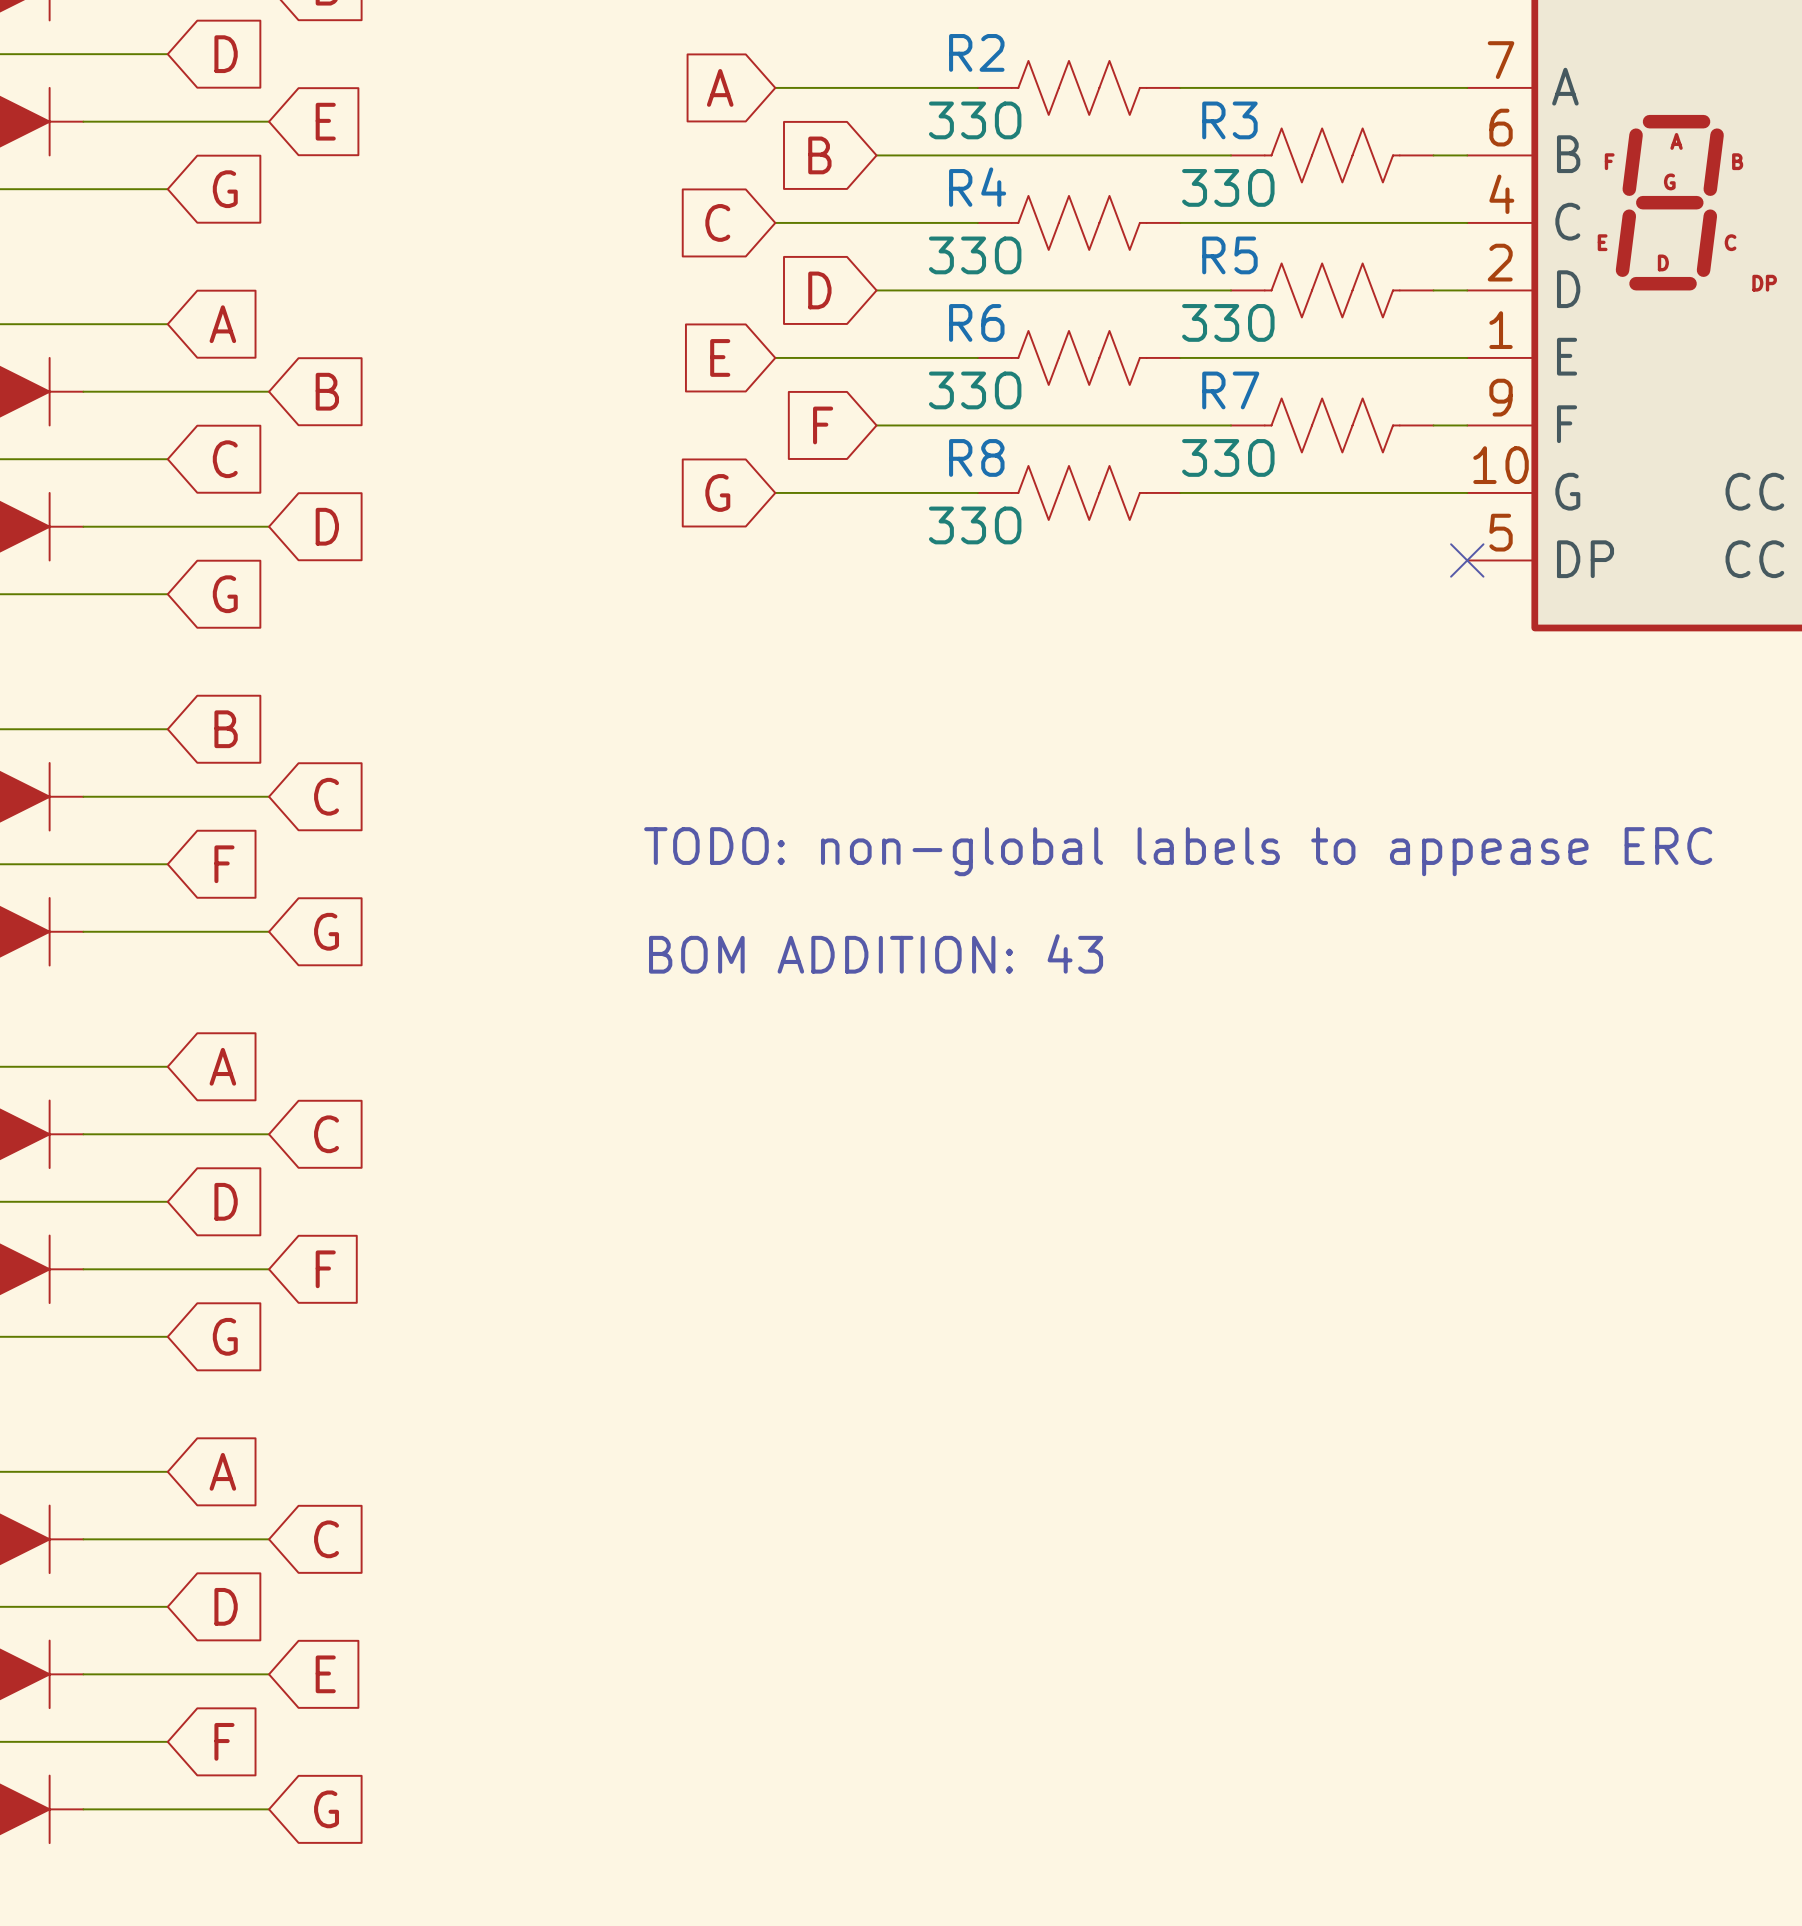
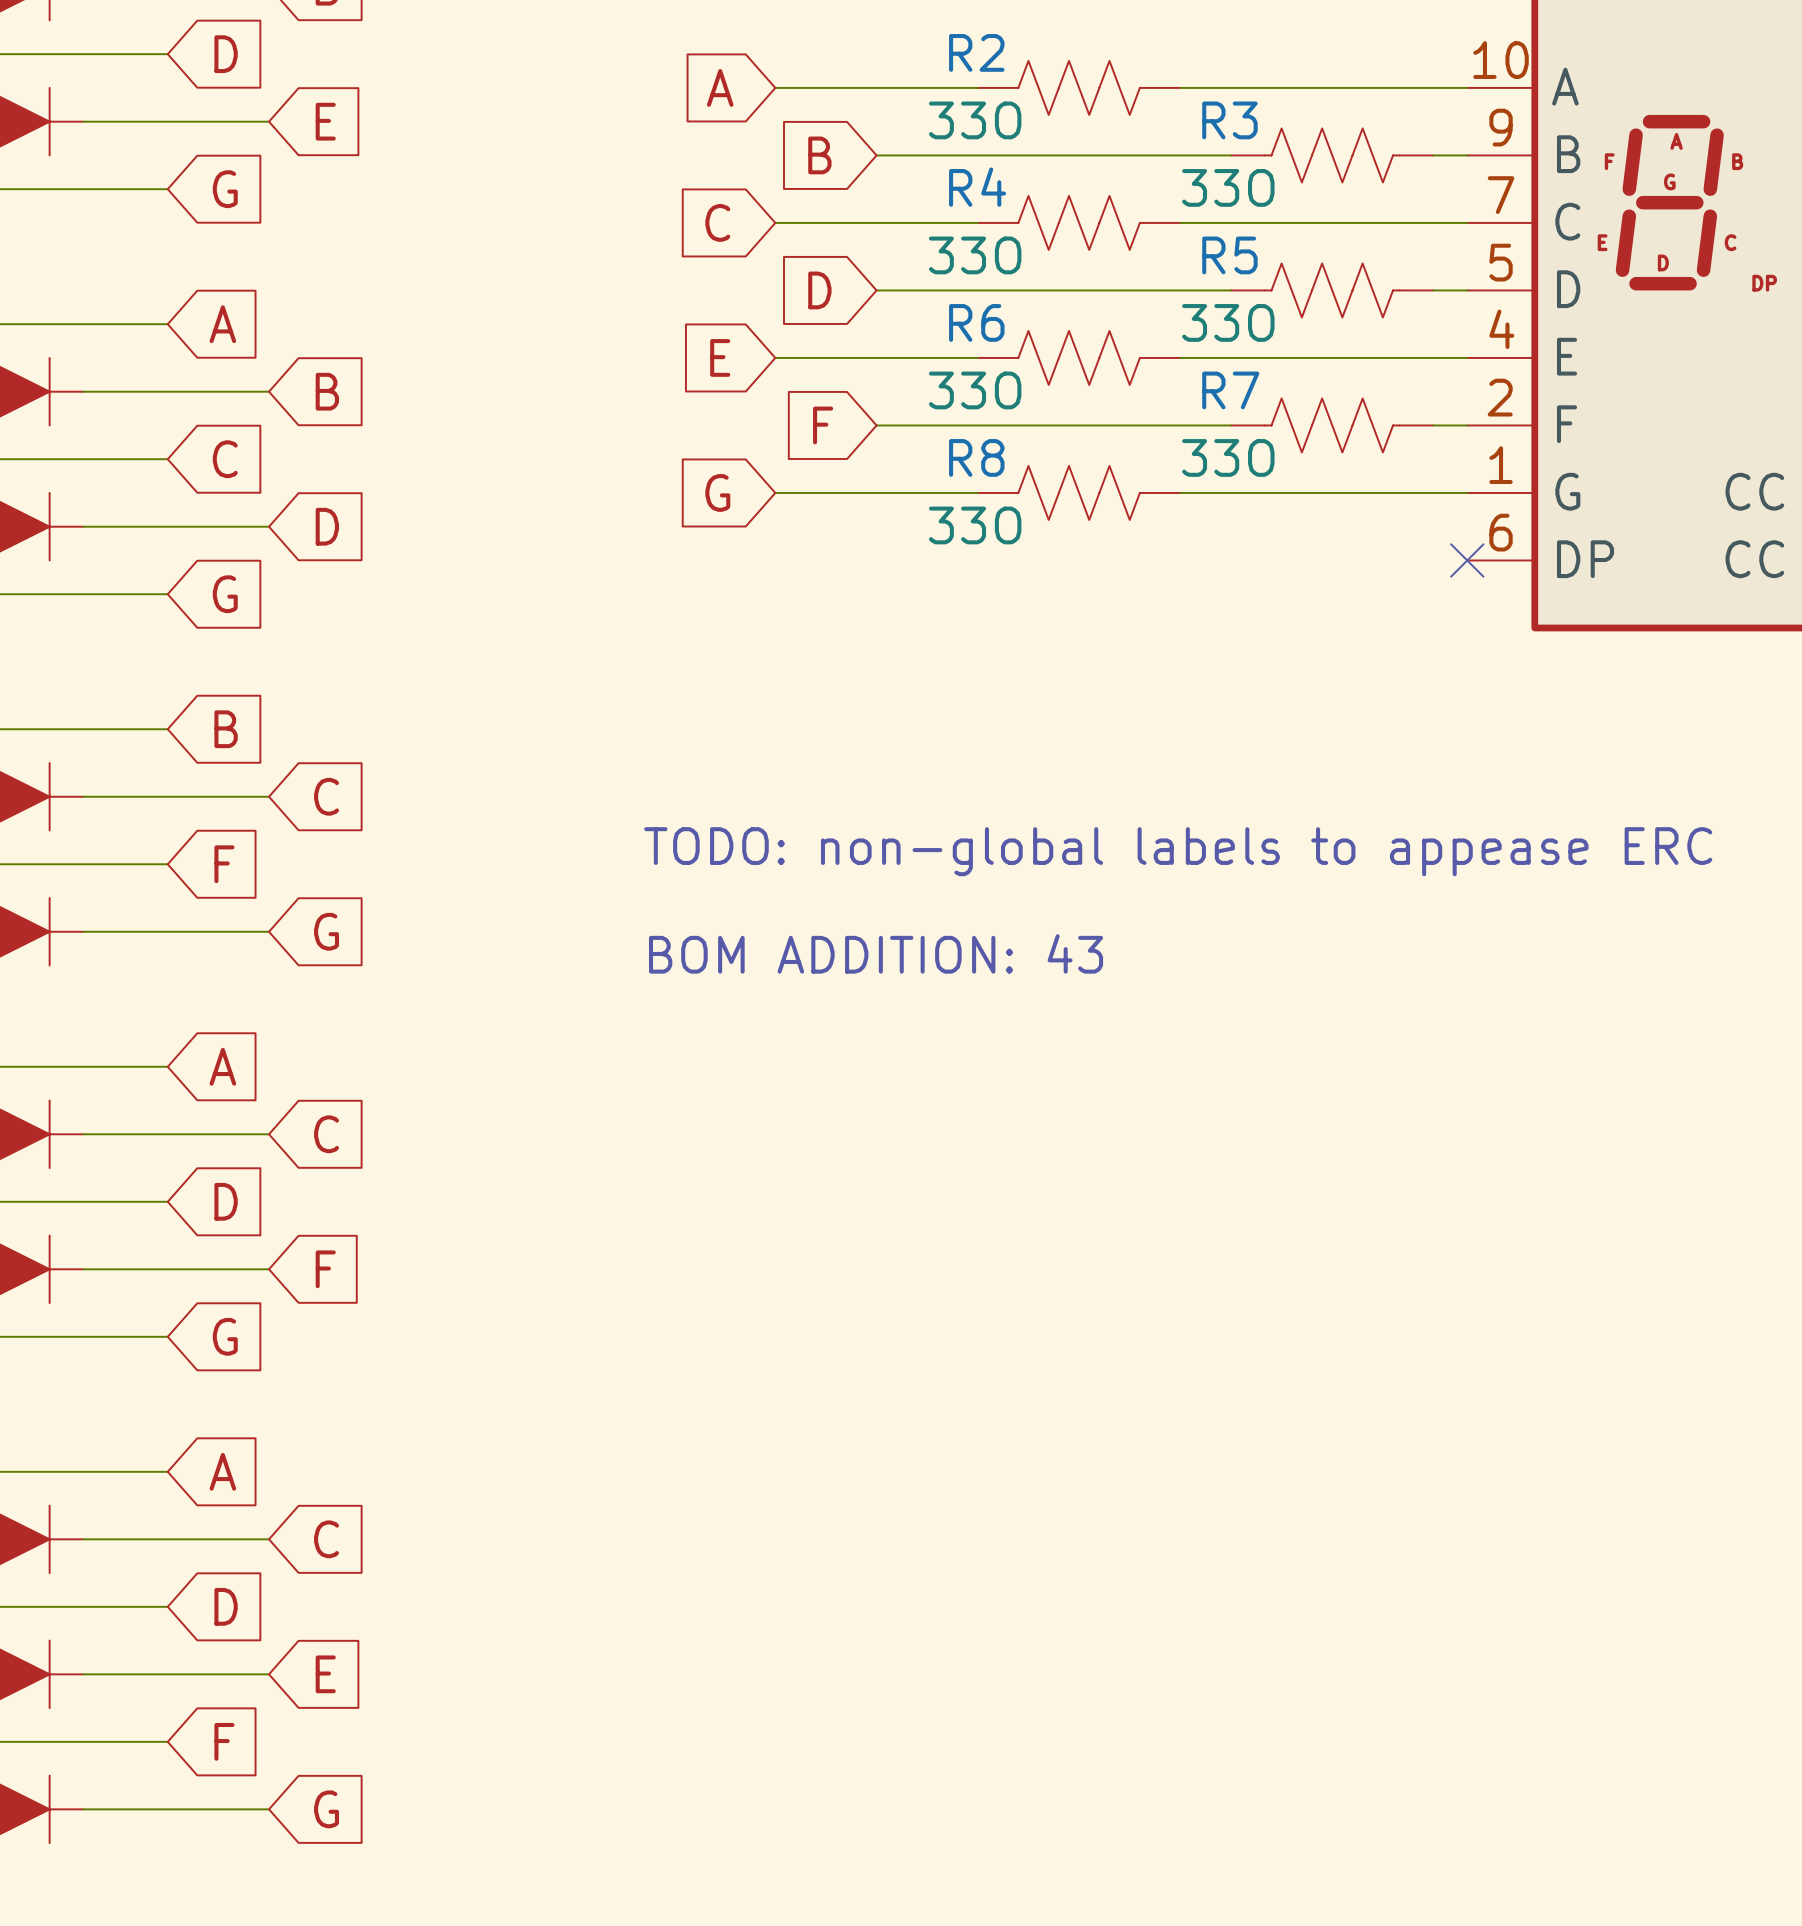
part pin number: 7 (1501, 60) -> 10 (1501, 60)
part pin number: 6 (1501, 127) -> 9 (1501, 127)
part pin number: 4 (1501, 194) -> 7 (1501, 195)
part pin number: 2 (1500, 262) -> 5 (1501, 262)
part pin number: 1 (1501, 330) -> 4 (1501, 329)
part pin number: 9 (1501, 397) -> 2 (1500, 397)
part pin number: 10 (1501, 465) -> 1 (1501, 465)
part pin number: 5 (1501, 532) -> 6 (1501, 532)

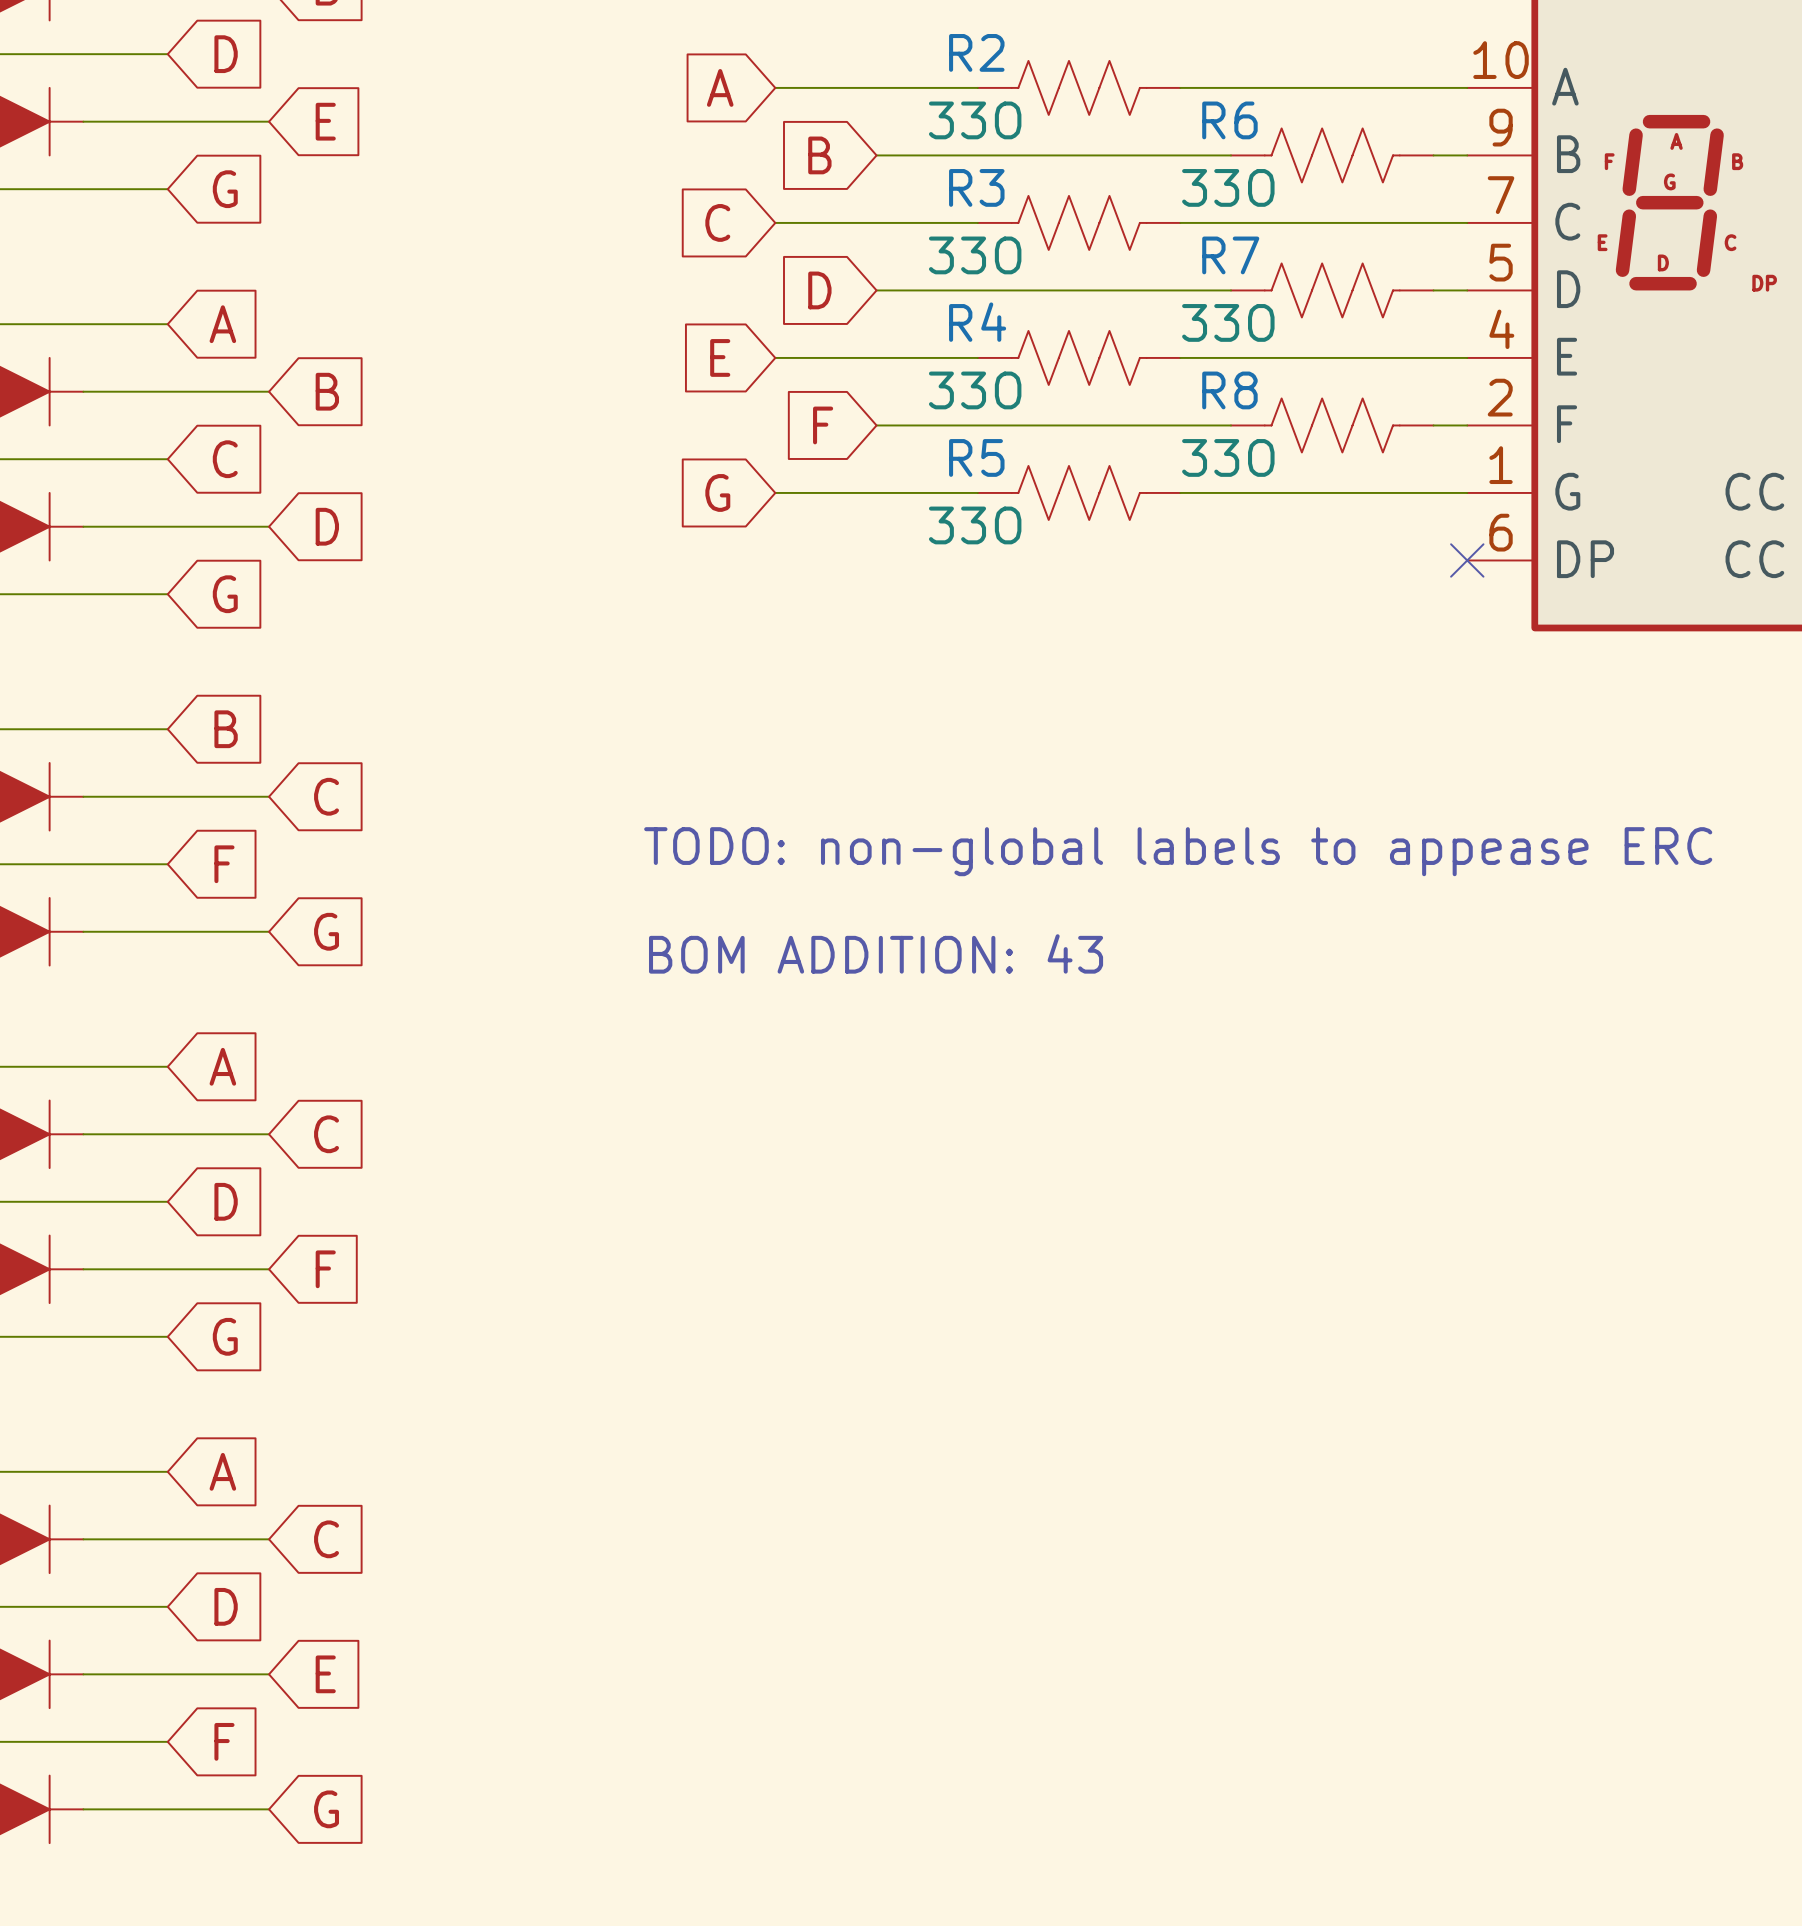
R3 name: R3 (1229, 120) -> R6 (1229, 120)
R4 name: R4 (977, 187) -> R3 (976, 187)
R5 name: R5 (1229, 255) -> R7 (1230, 255)
R6 name: R6 (976, 322) -> R4 (977, 322)
R7 name: R7 (1230, 390) -> R8 (1229, 390)
R8 name: R8 (976, 457) -> R5 (976, 457)

